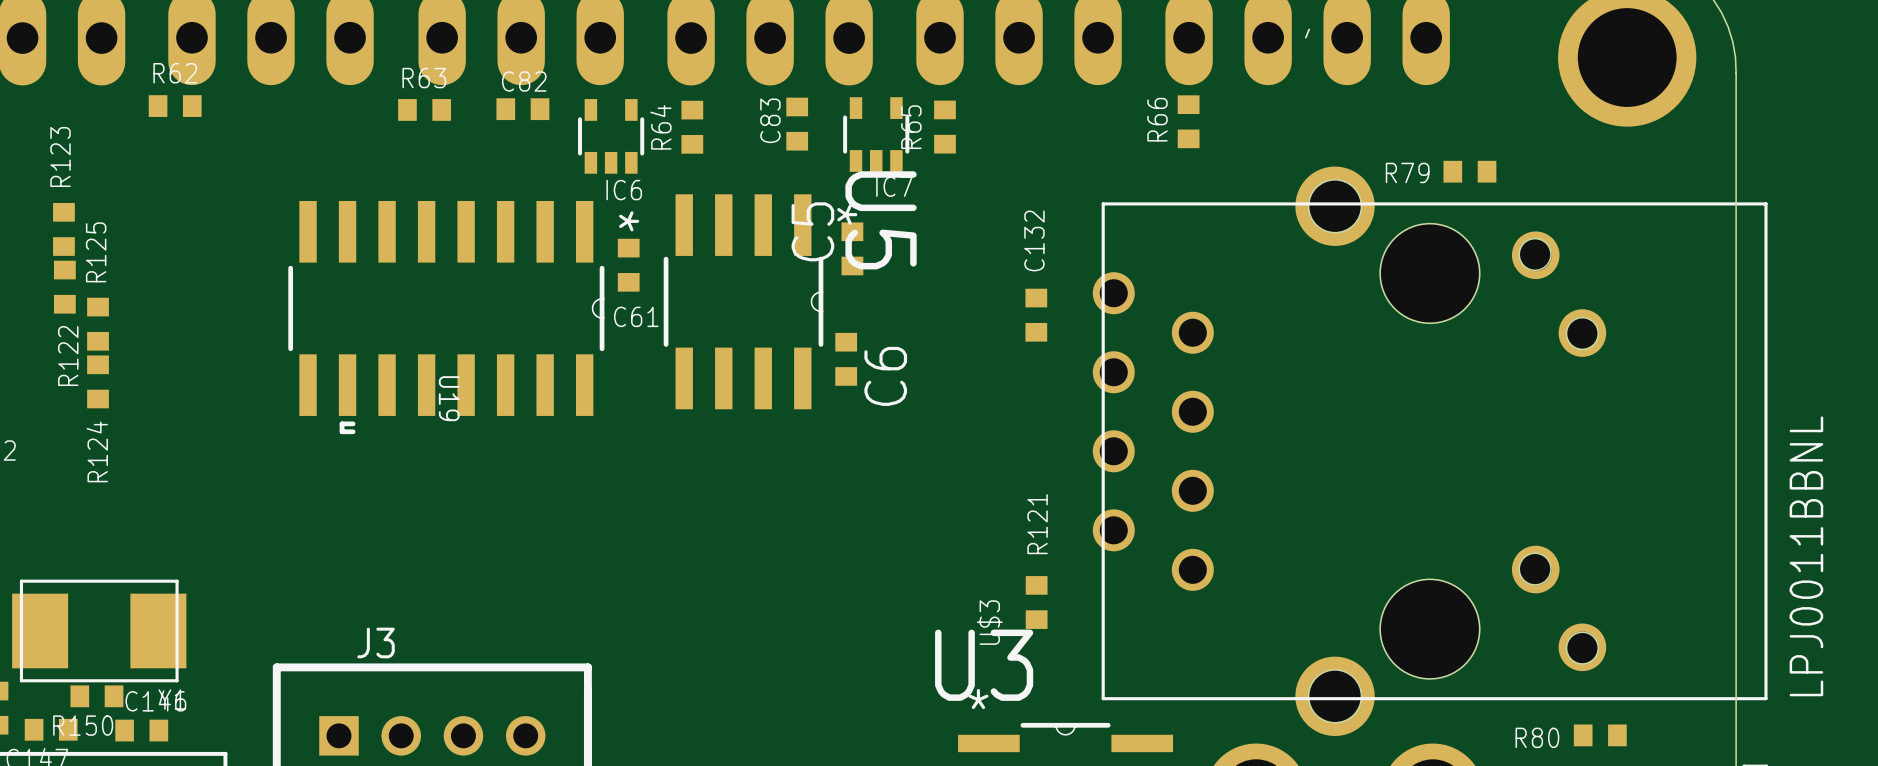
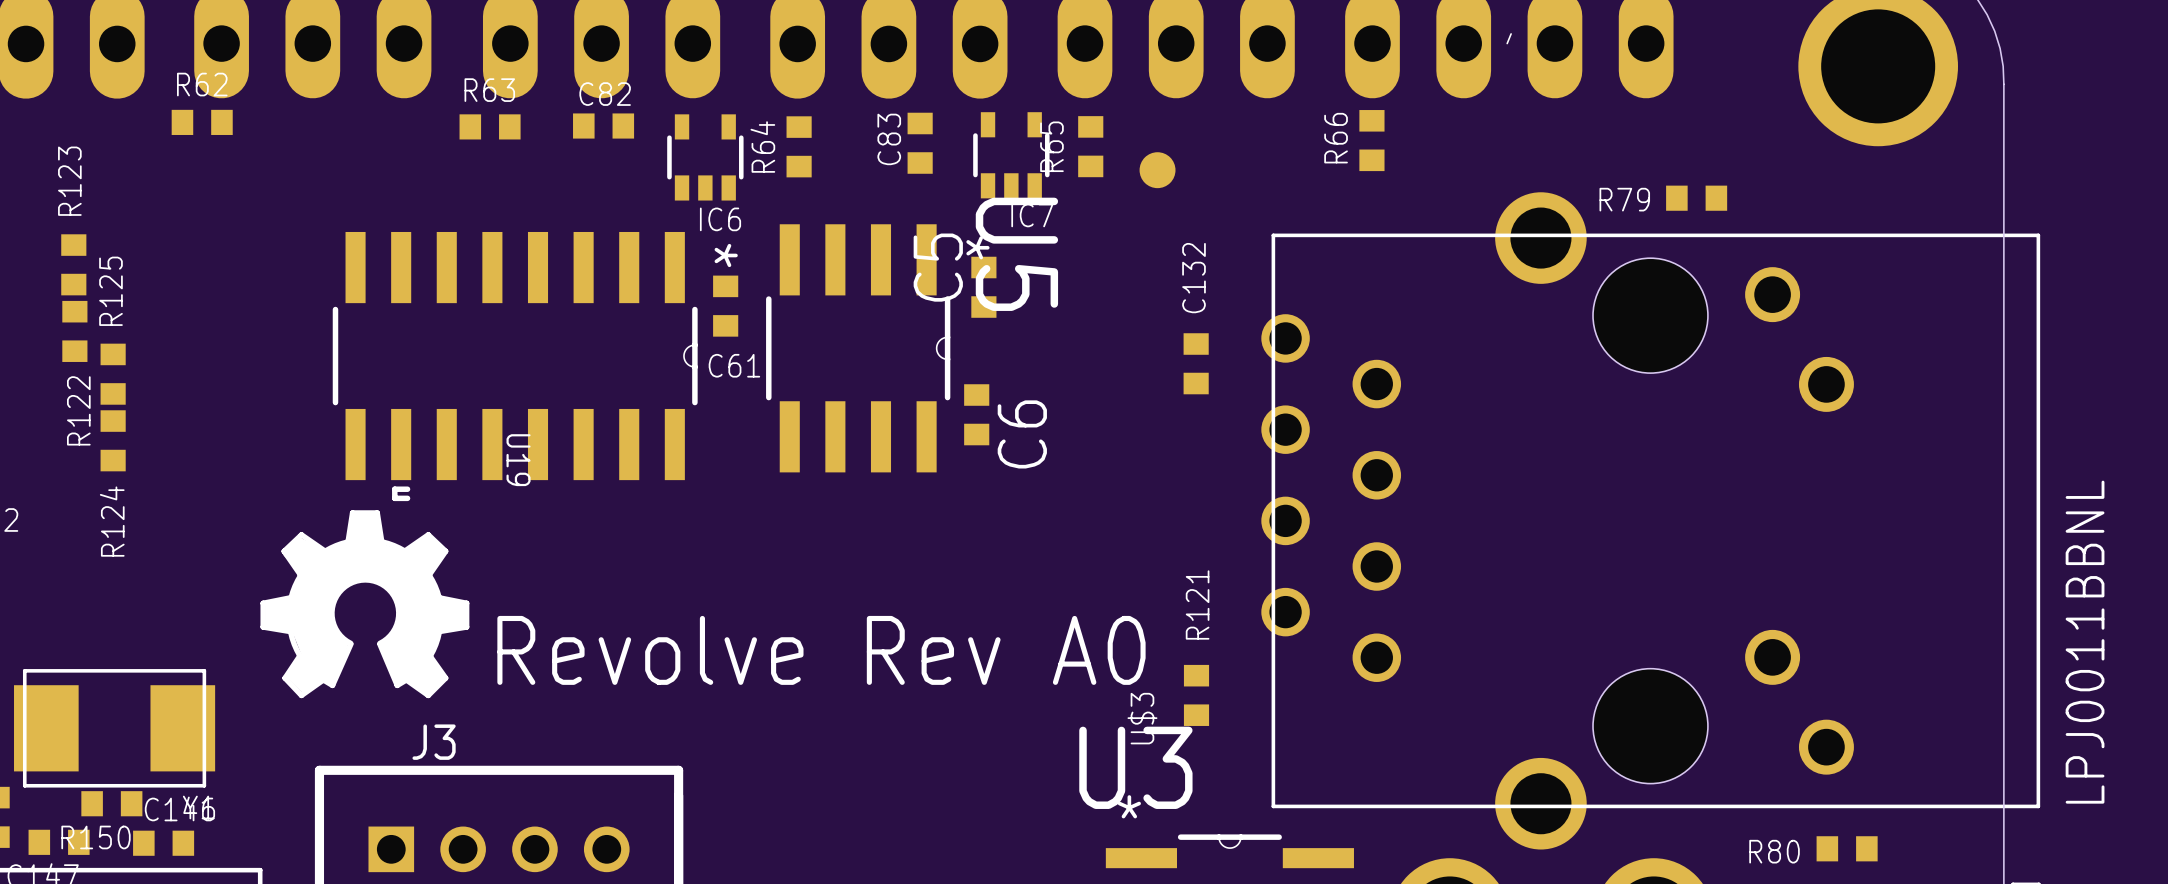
part: none -> (1157, 170)
U$3 footprint: [1092, 166, 1768, 737] -> [1261, 192, 2041, 850]
drawing: none -> [260, 510, 470, 699]
text: none -> Revolve Rev A0 (821, 650)

